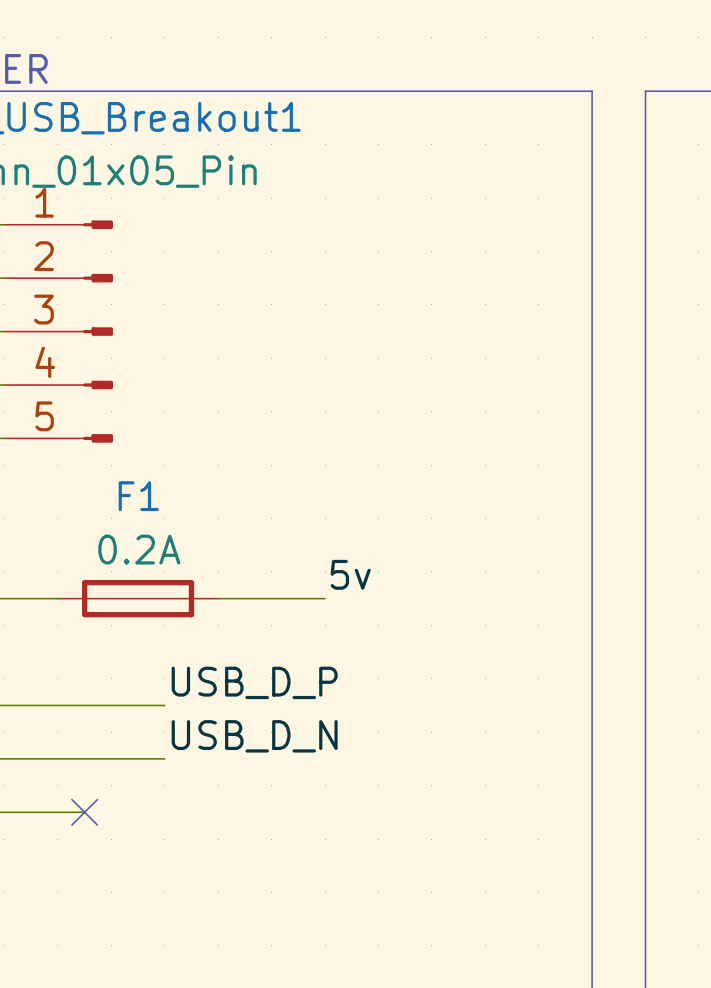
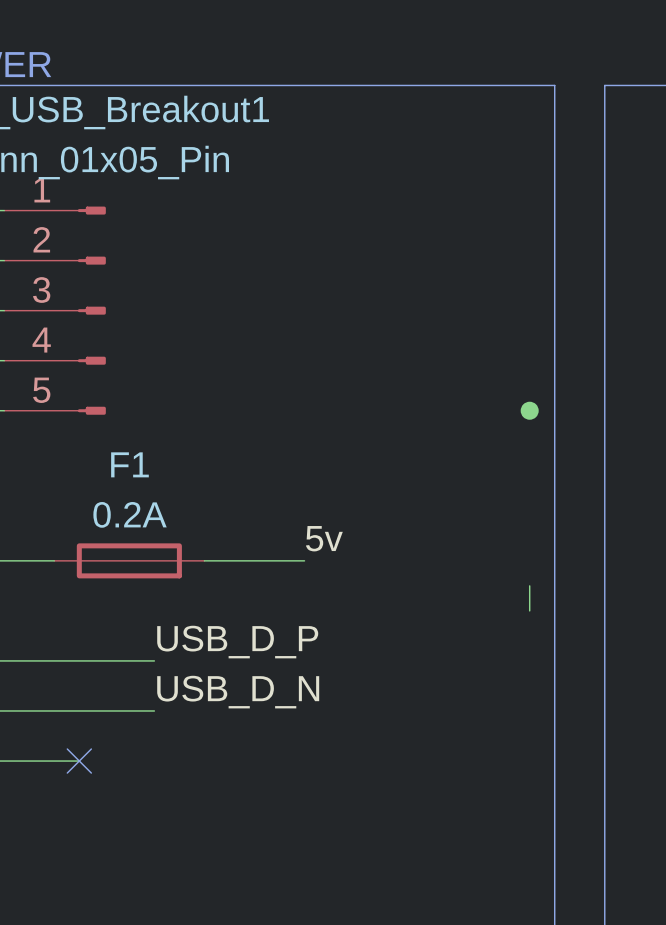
junction: none -> (529, 410)
wire: none -> (529, 585) (529, 610)

